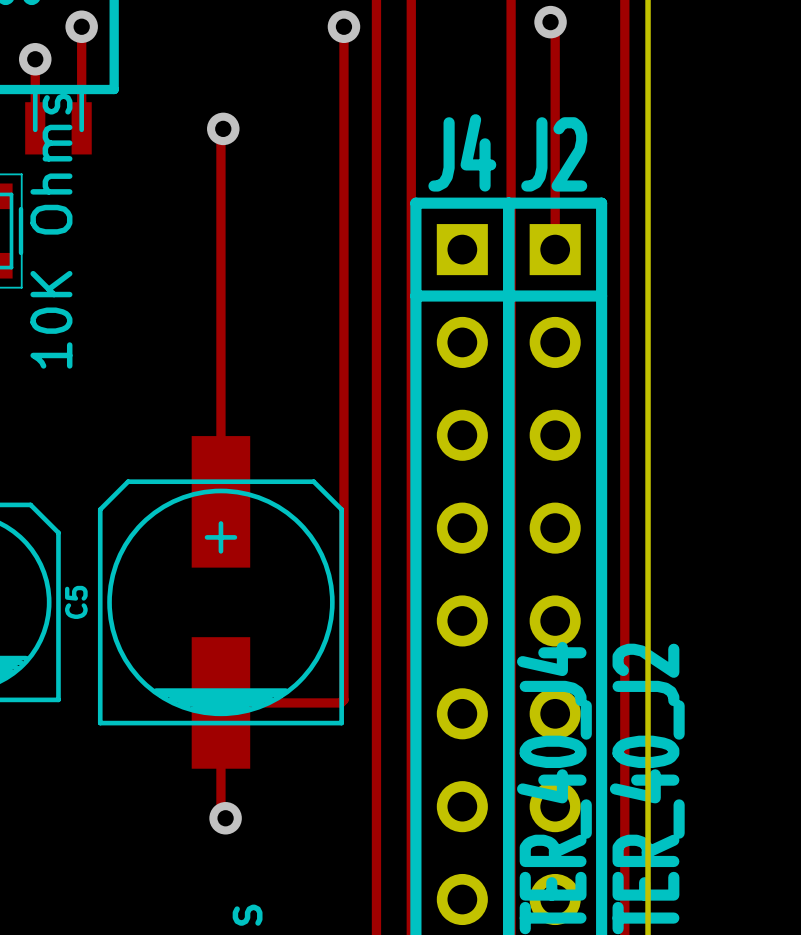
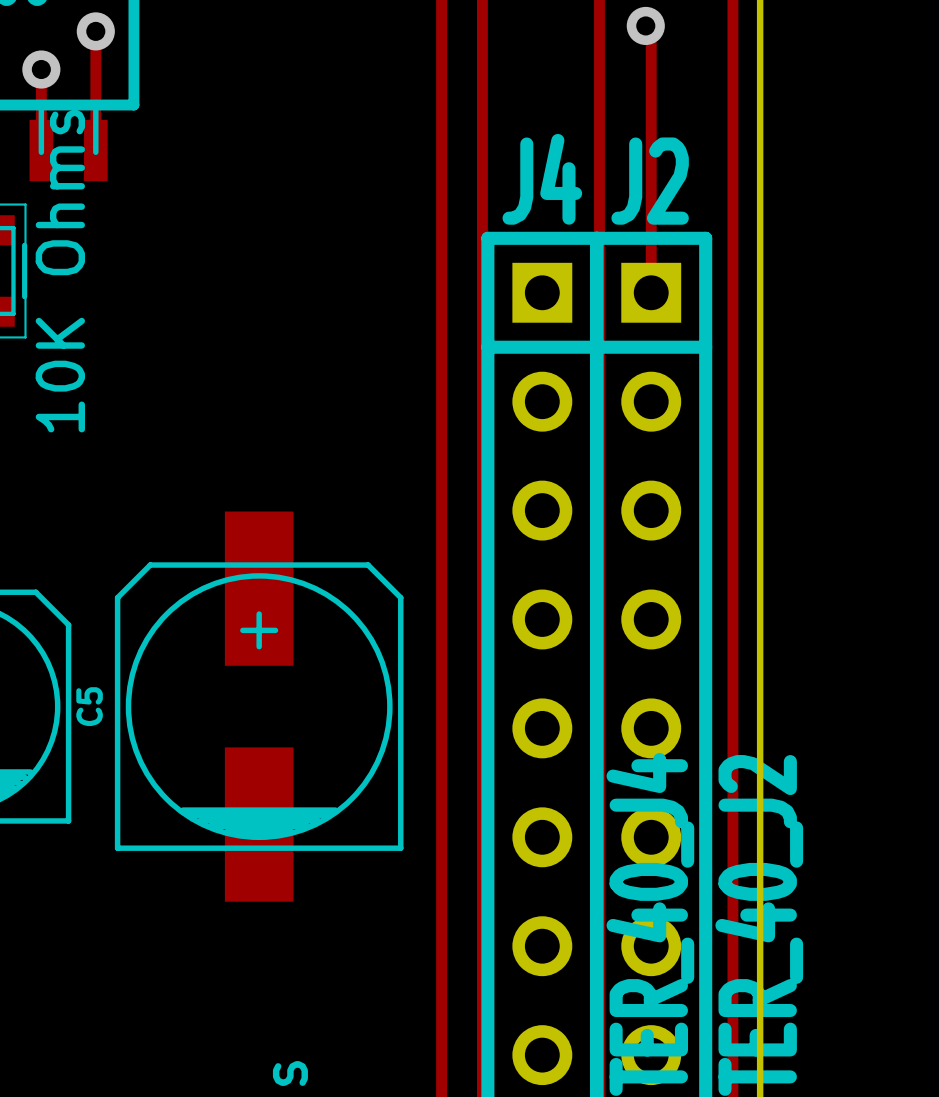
track: (343, 26) (343, 699) (340, 702) (220, 702) (220, 813) (225, 818) -> none
via: (343, 26) -> none
track: (223, 128) (220, 131) (220, 501) -> none
via: (223, 128) -> none
via: (225, 818) -> none

